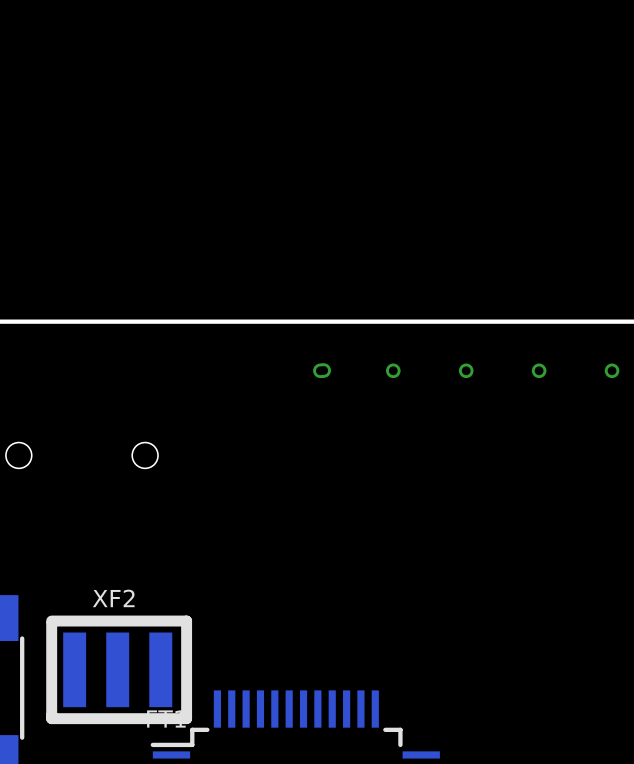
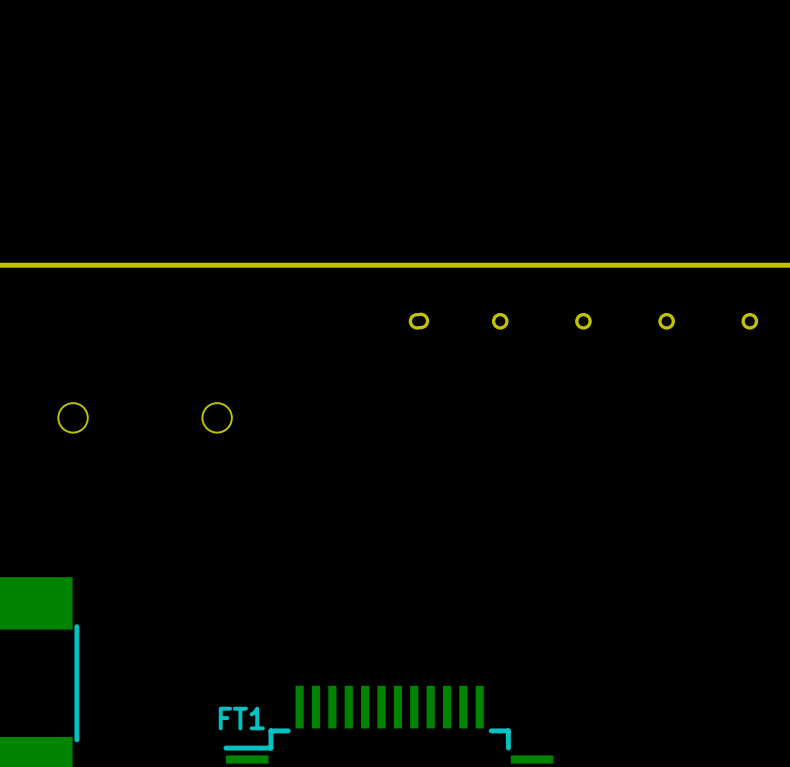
XF2: (119, 669) -> none

